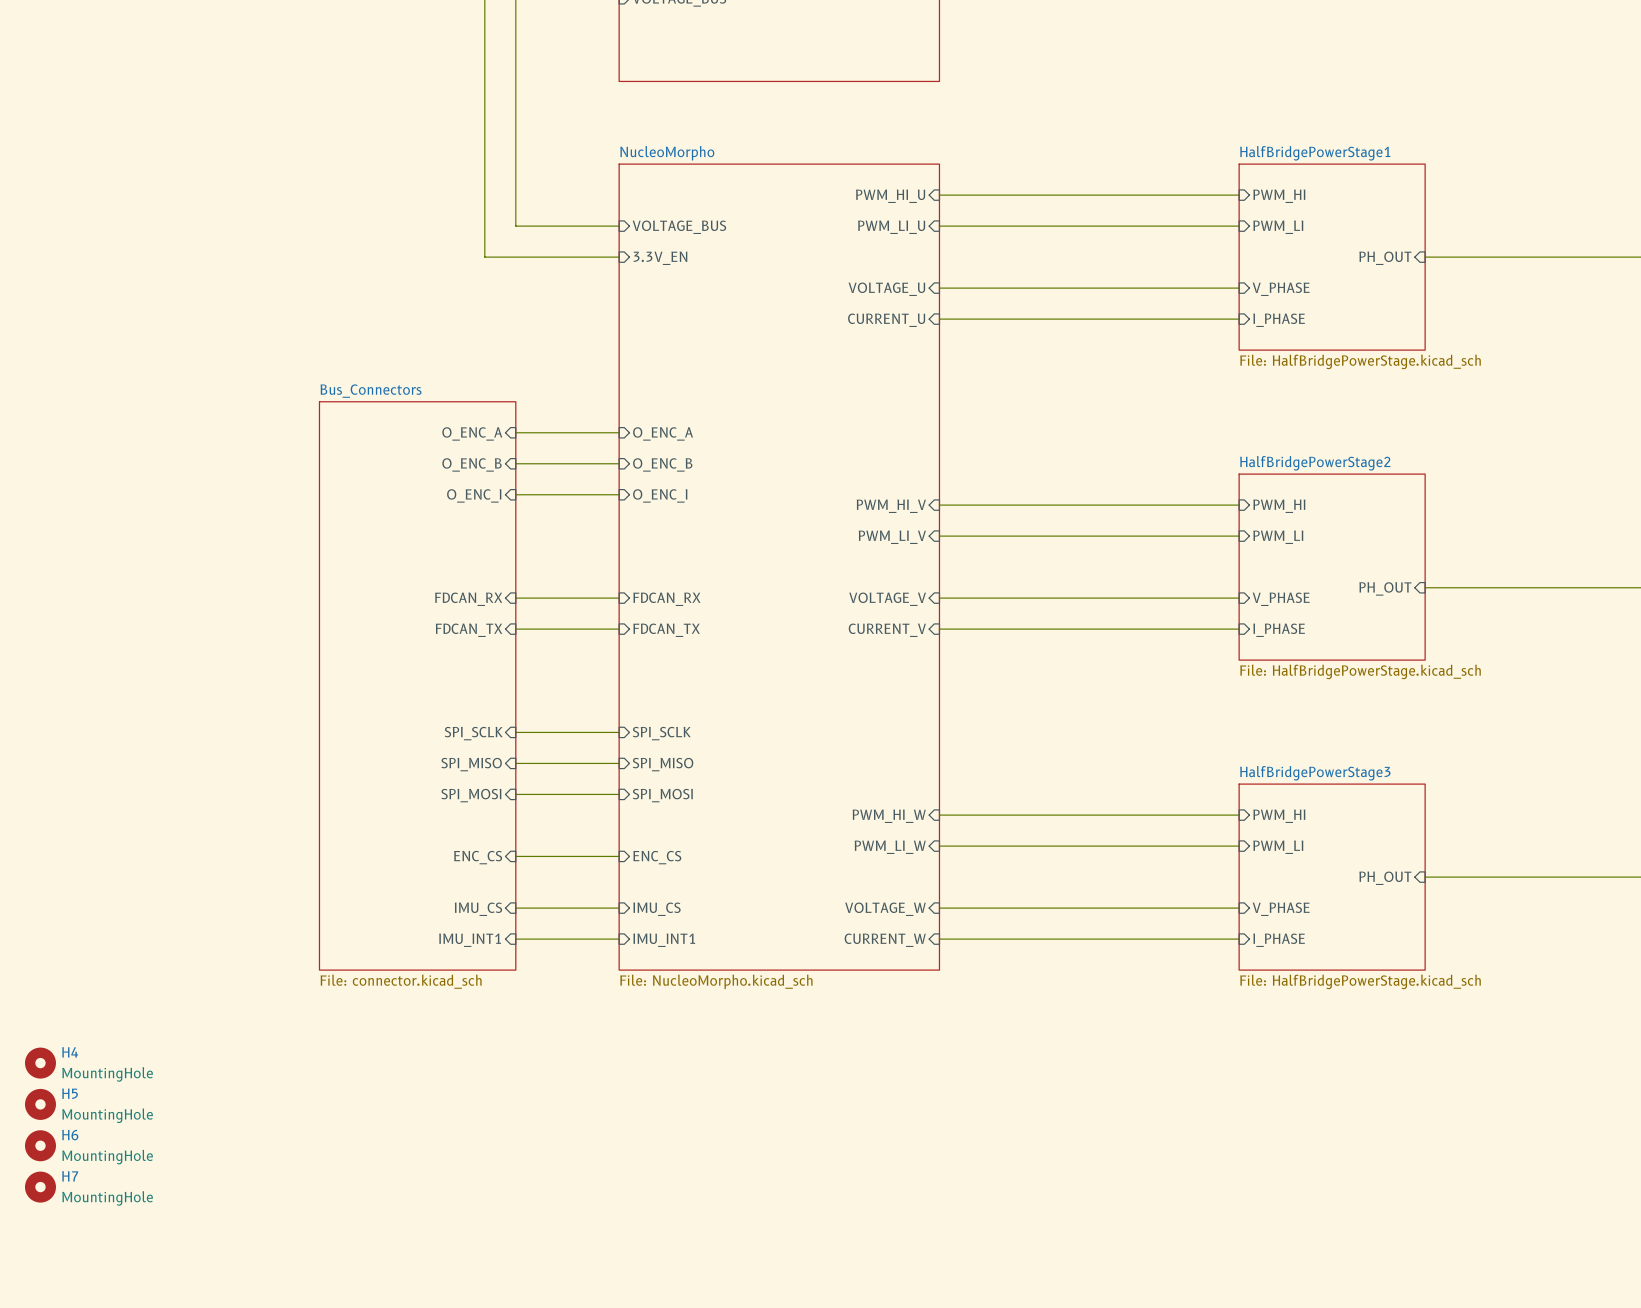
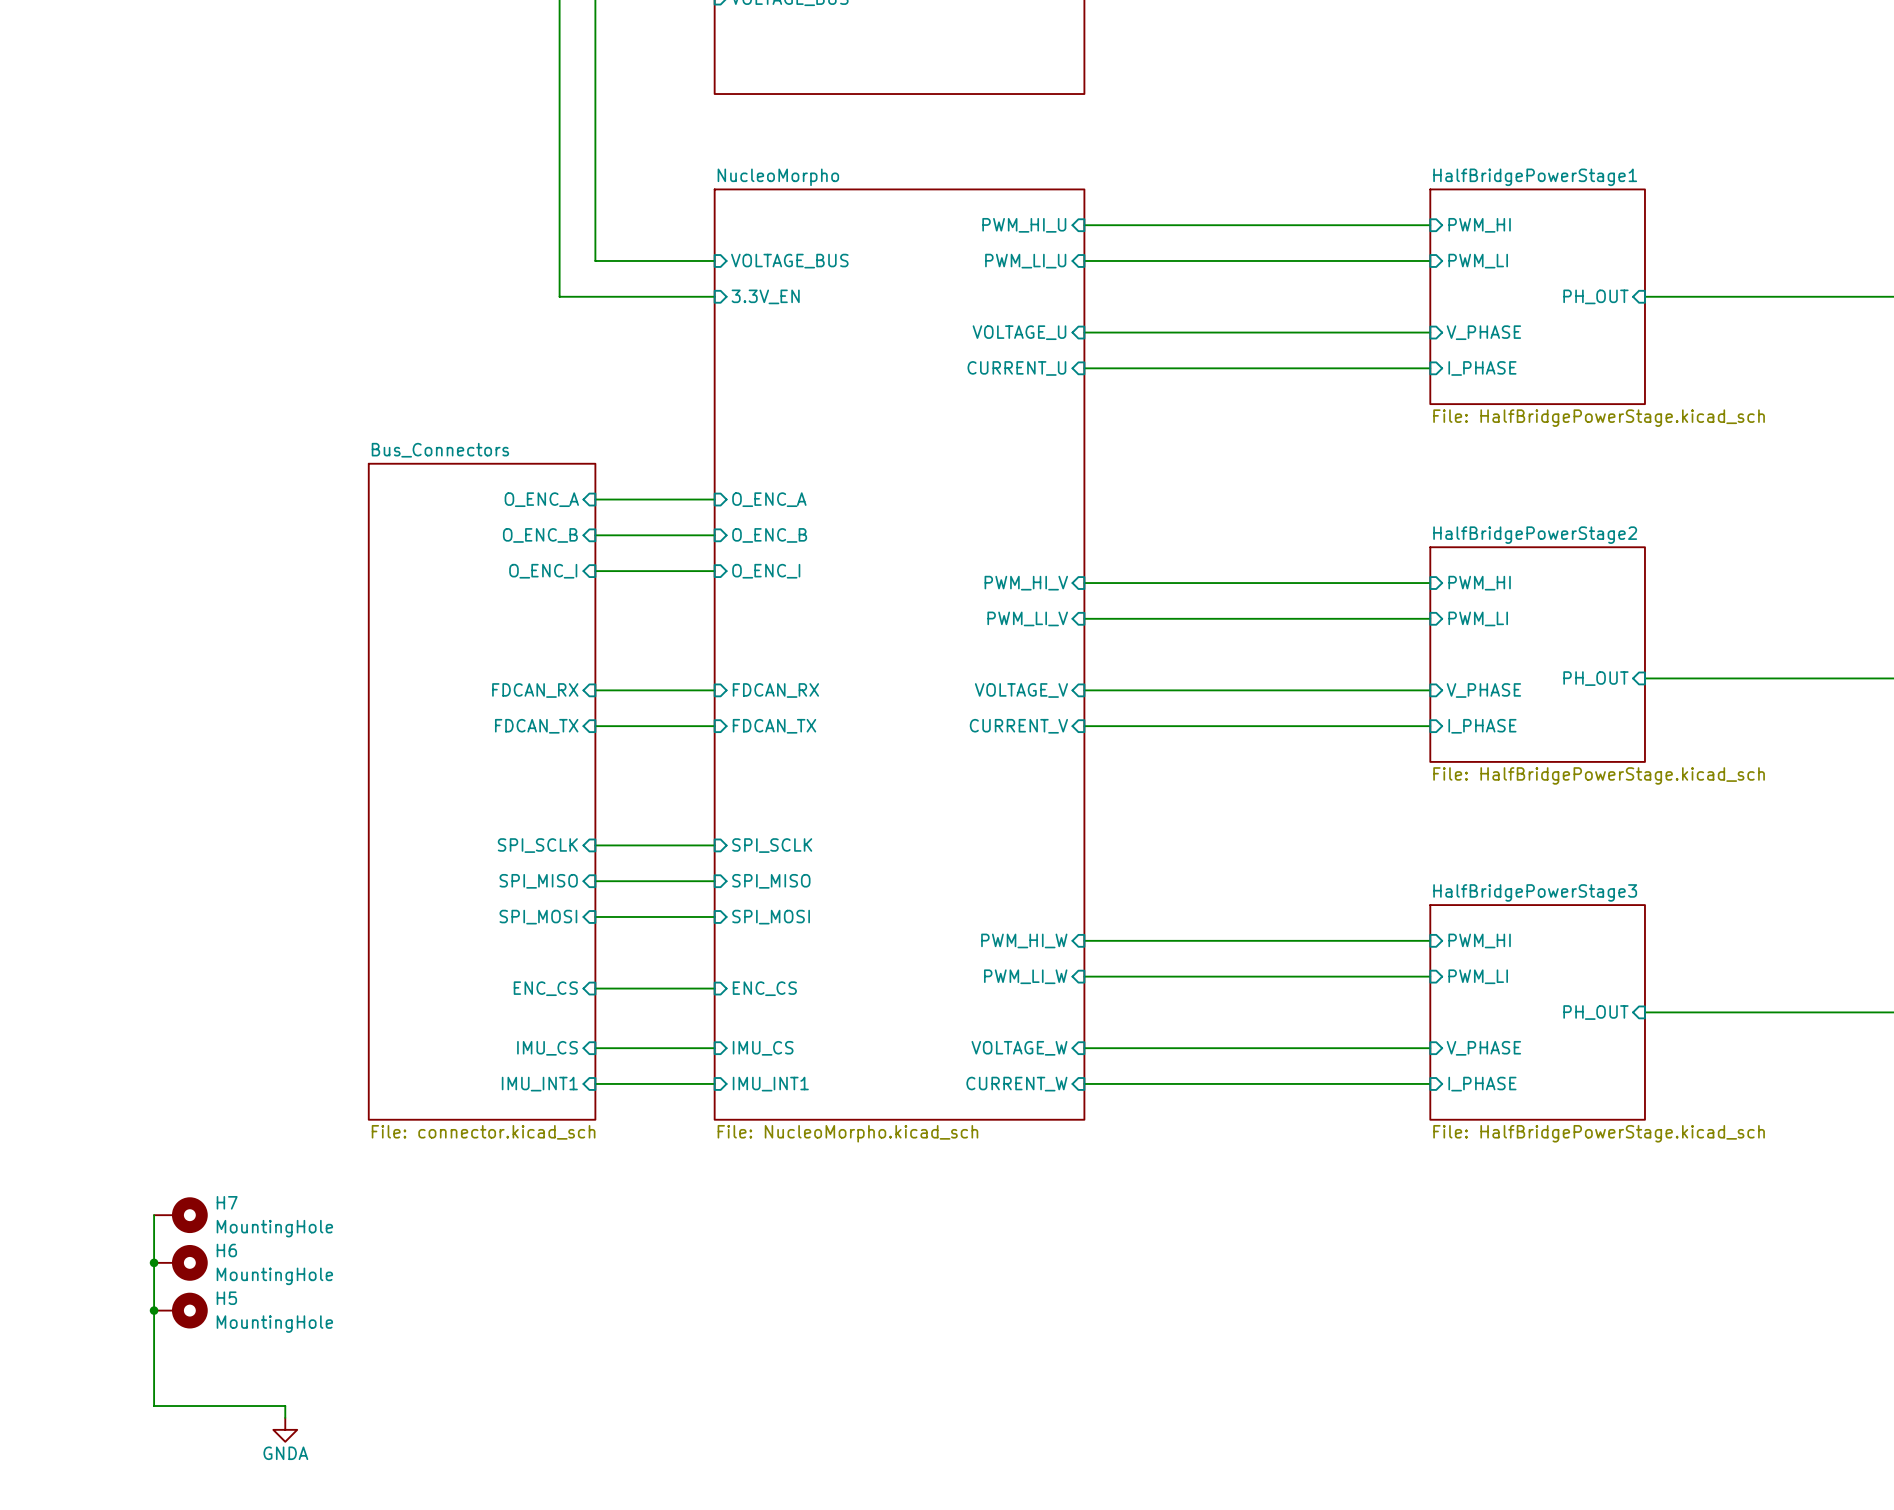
wire: none -> (154, 1215) (154, 1406) (285, 1406) (285, 1417)
H4: MountingHole (40, 1063) -> none
H5 symbol: [24, 1088, 56, 1120] -> [154, 1292, 208, 1329]
junction: none -> (154, 1262)
H6 symbol: [24, 1130, 56, 1162] -> [154, 1244, 208, 1281]
junction: none -> (154, 1310)
H7 symbol: [24, 1171, 56, 1203] -> [154, 1197, 208, 1234]
power symbol: none -> GNDA (285, 1429)

